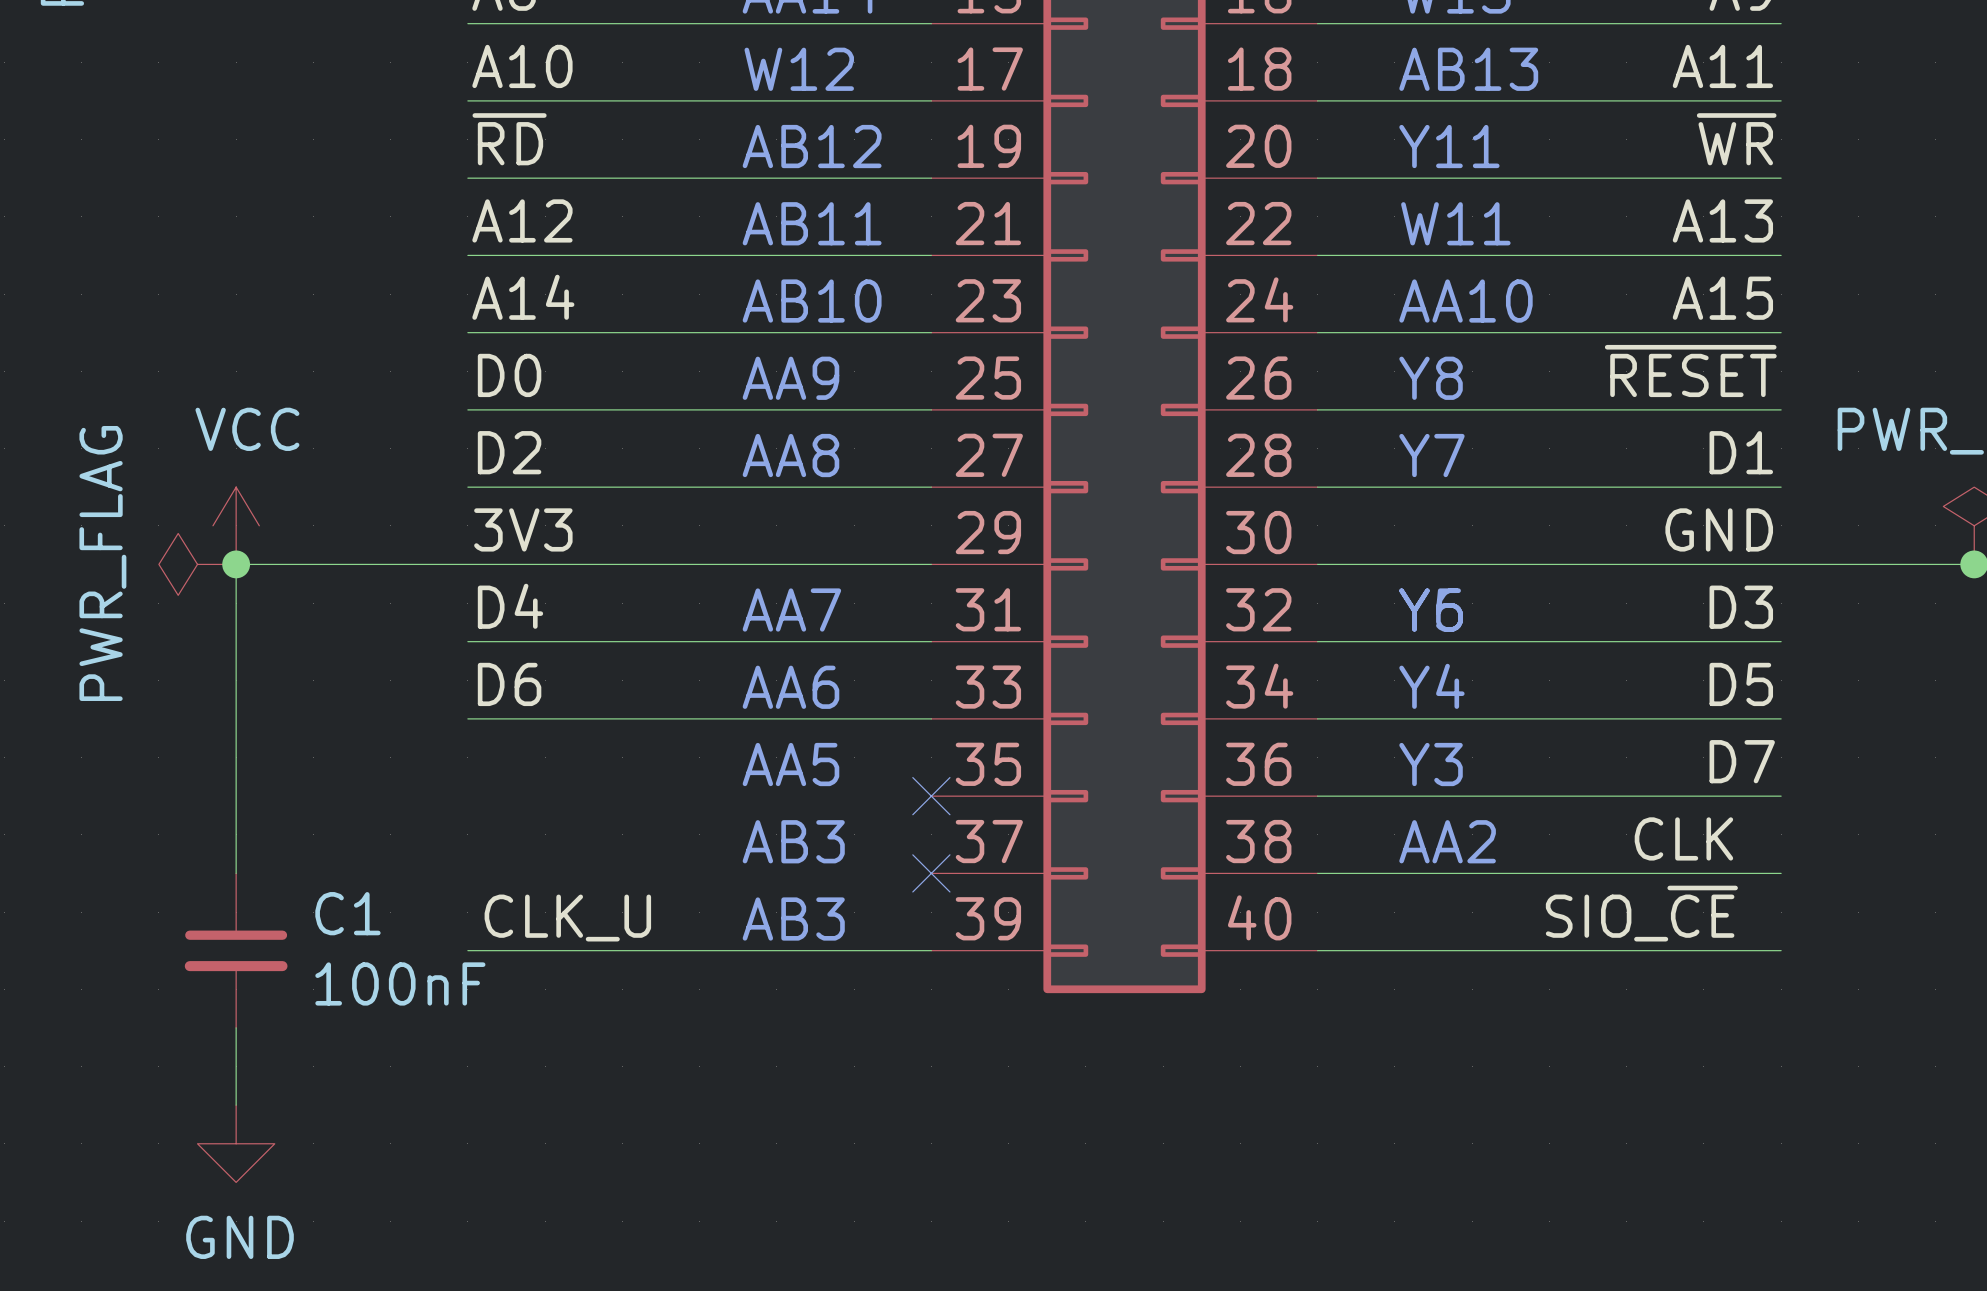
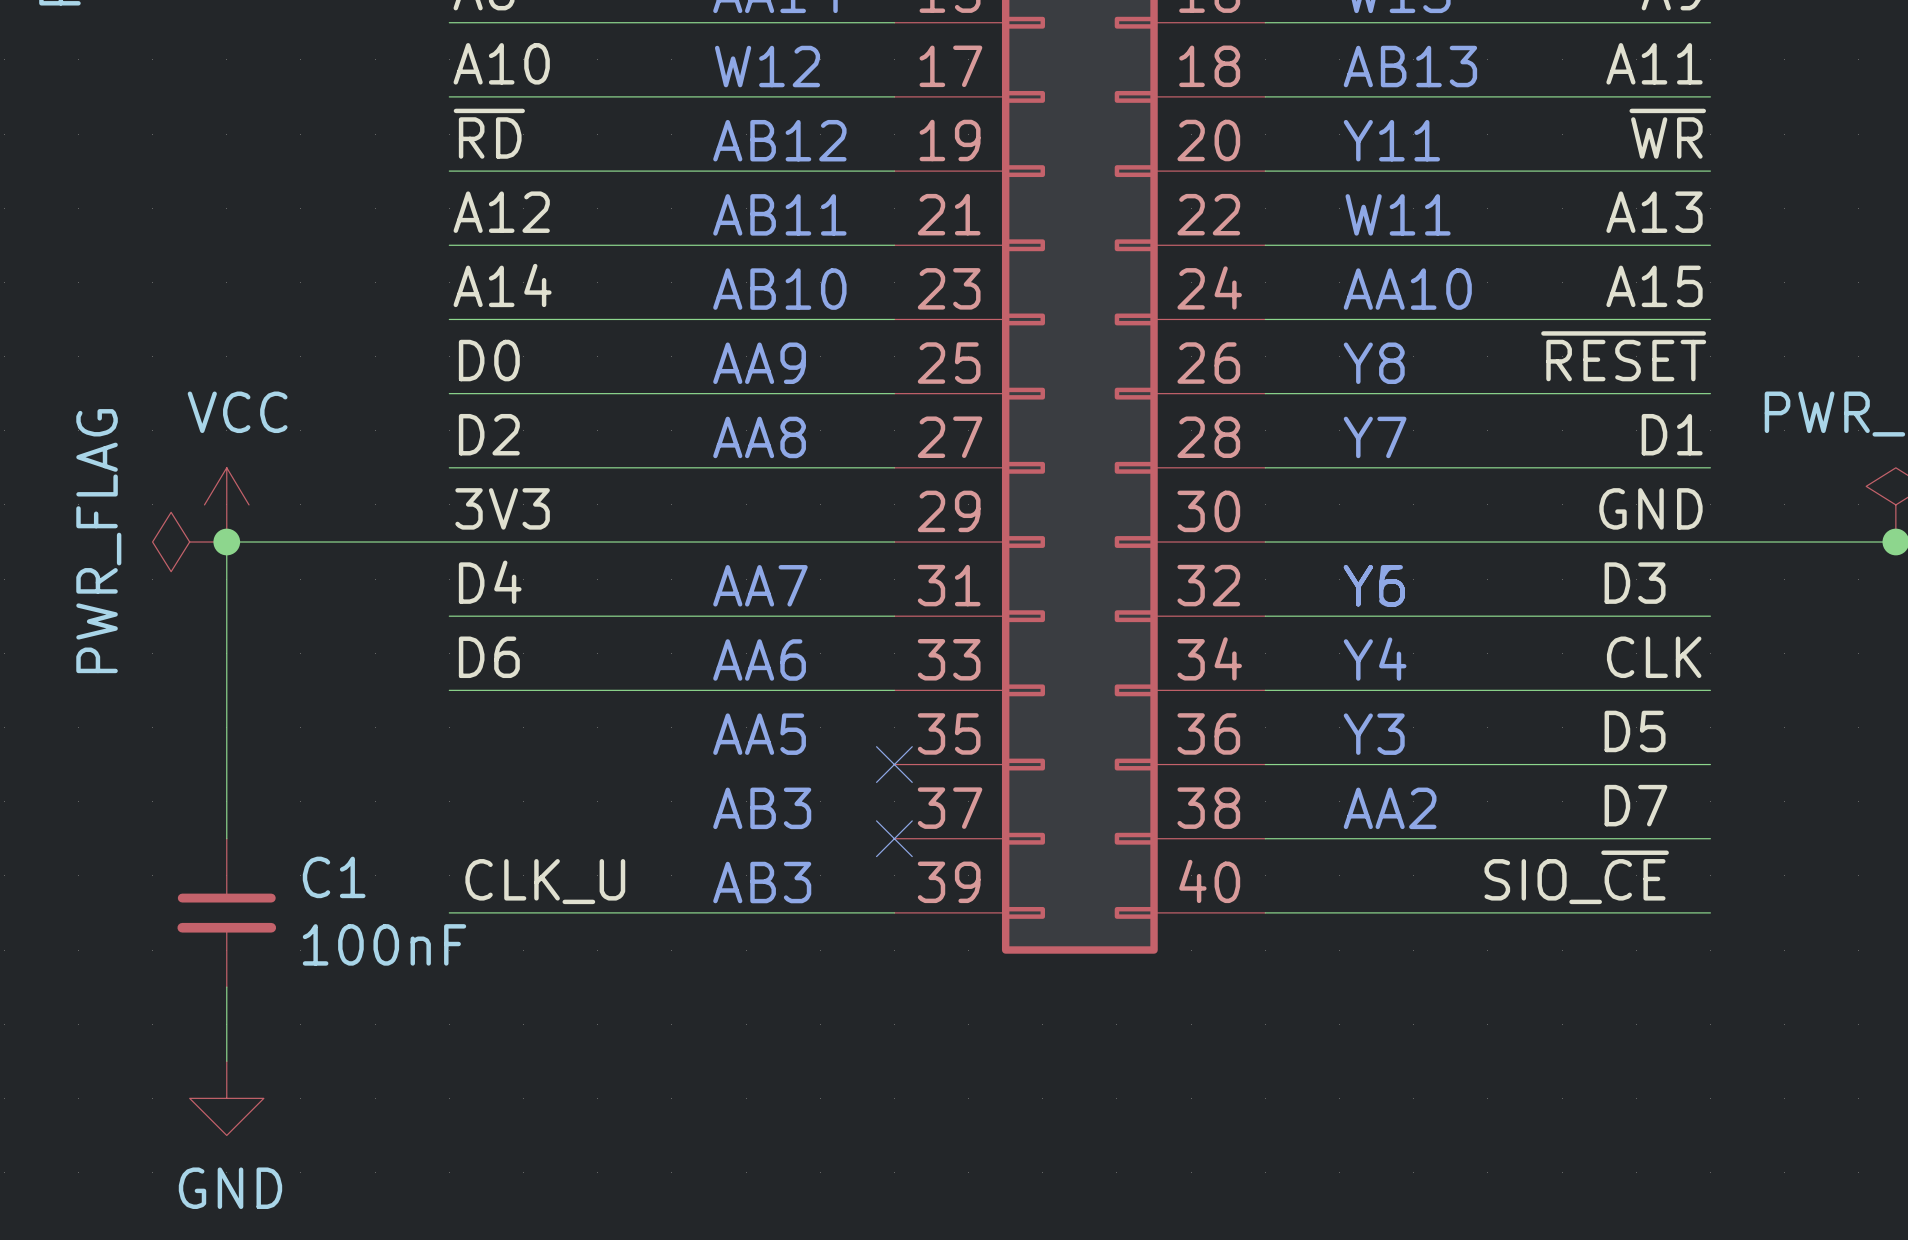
label position: D3 (1741, 607) -> D3 (1635, 583)
label position: D5 (1741, 684) -> D5 (1635, 731)
label position: D7 (1742, 761) -> D7 (1635, 805)
label position: CLK (1683, 838) -> CLK (1654, 657)

